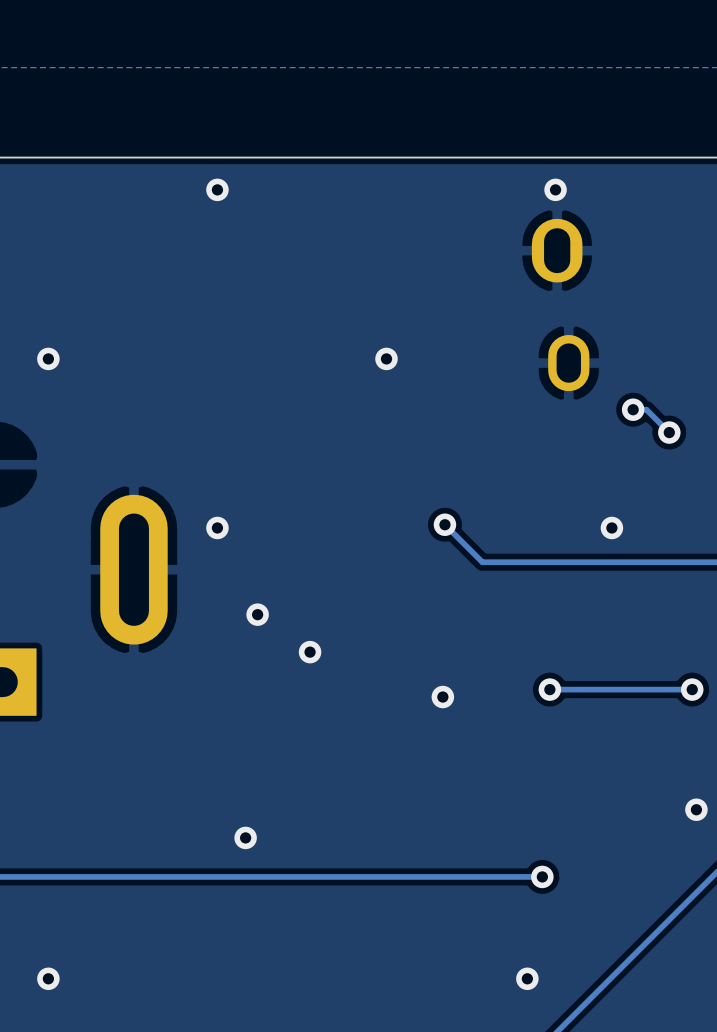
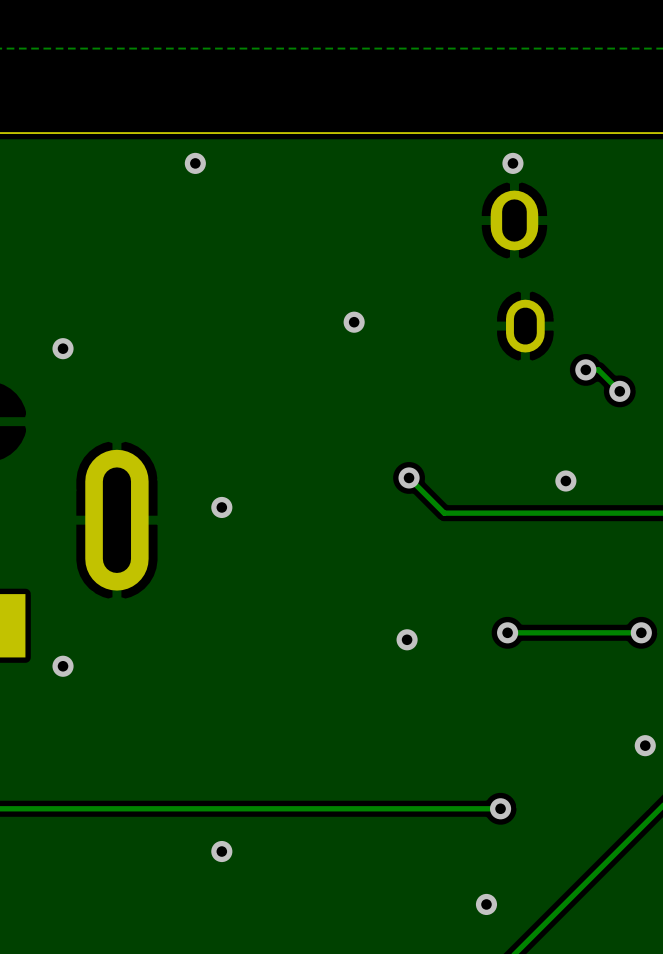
via position: (48, 358) -> (63, 348)
via: (217, 527) -> none
via: none -> (221, 507)
via: (257, 614) -> none
via: (310, 652) -> none
via: none -> (63, 666)
via position: (245, 837) -> (221, 851)
via: (48, 978) -> none

